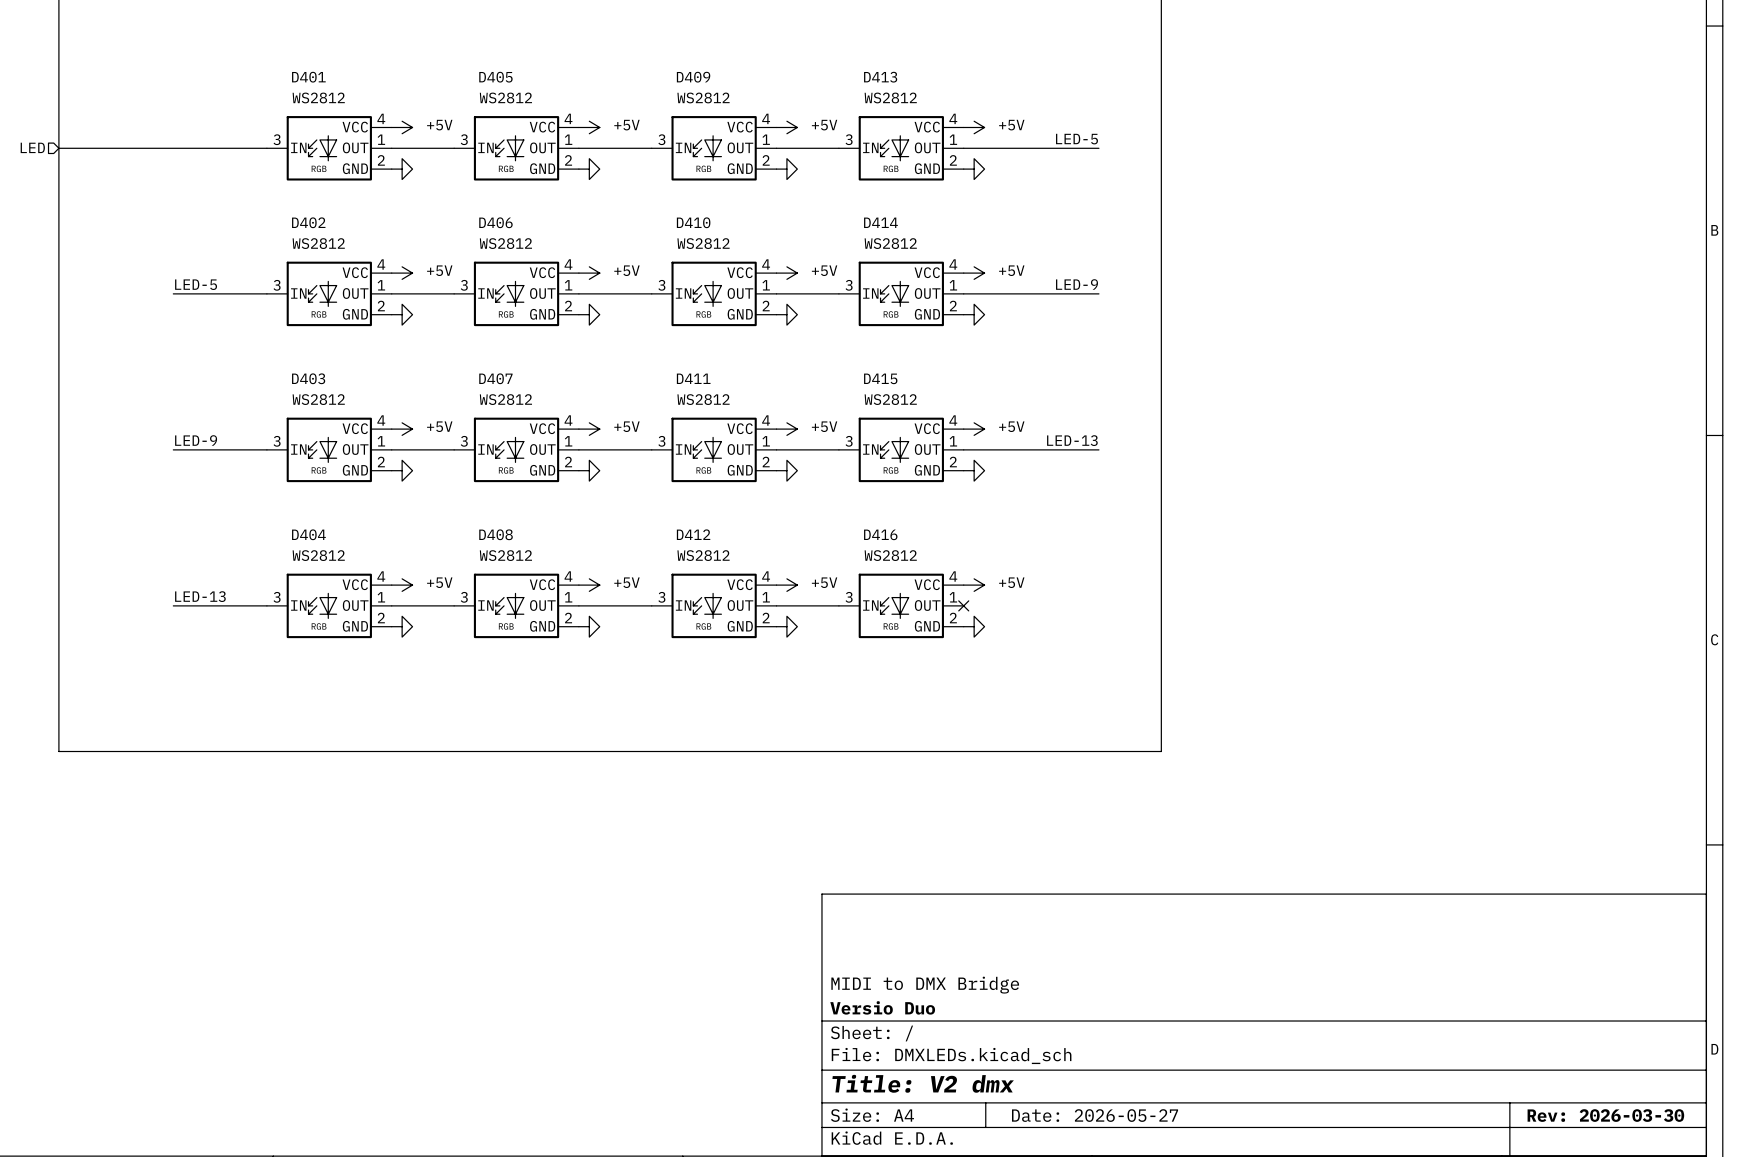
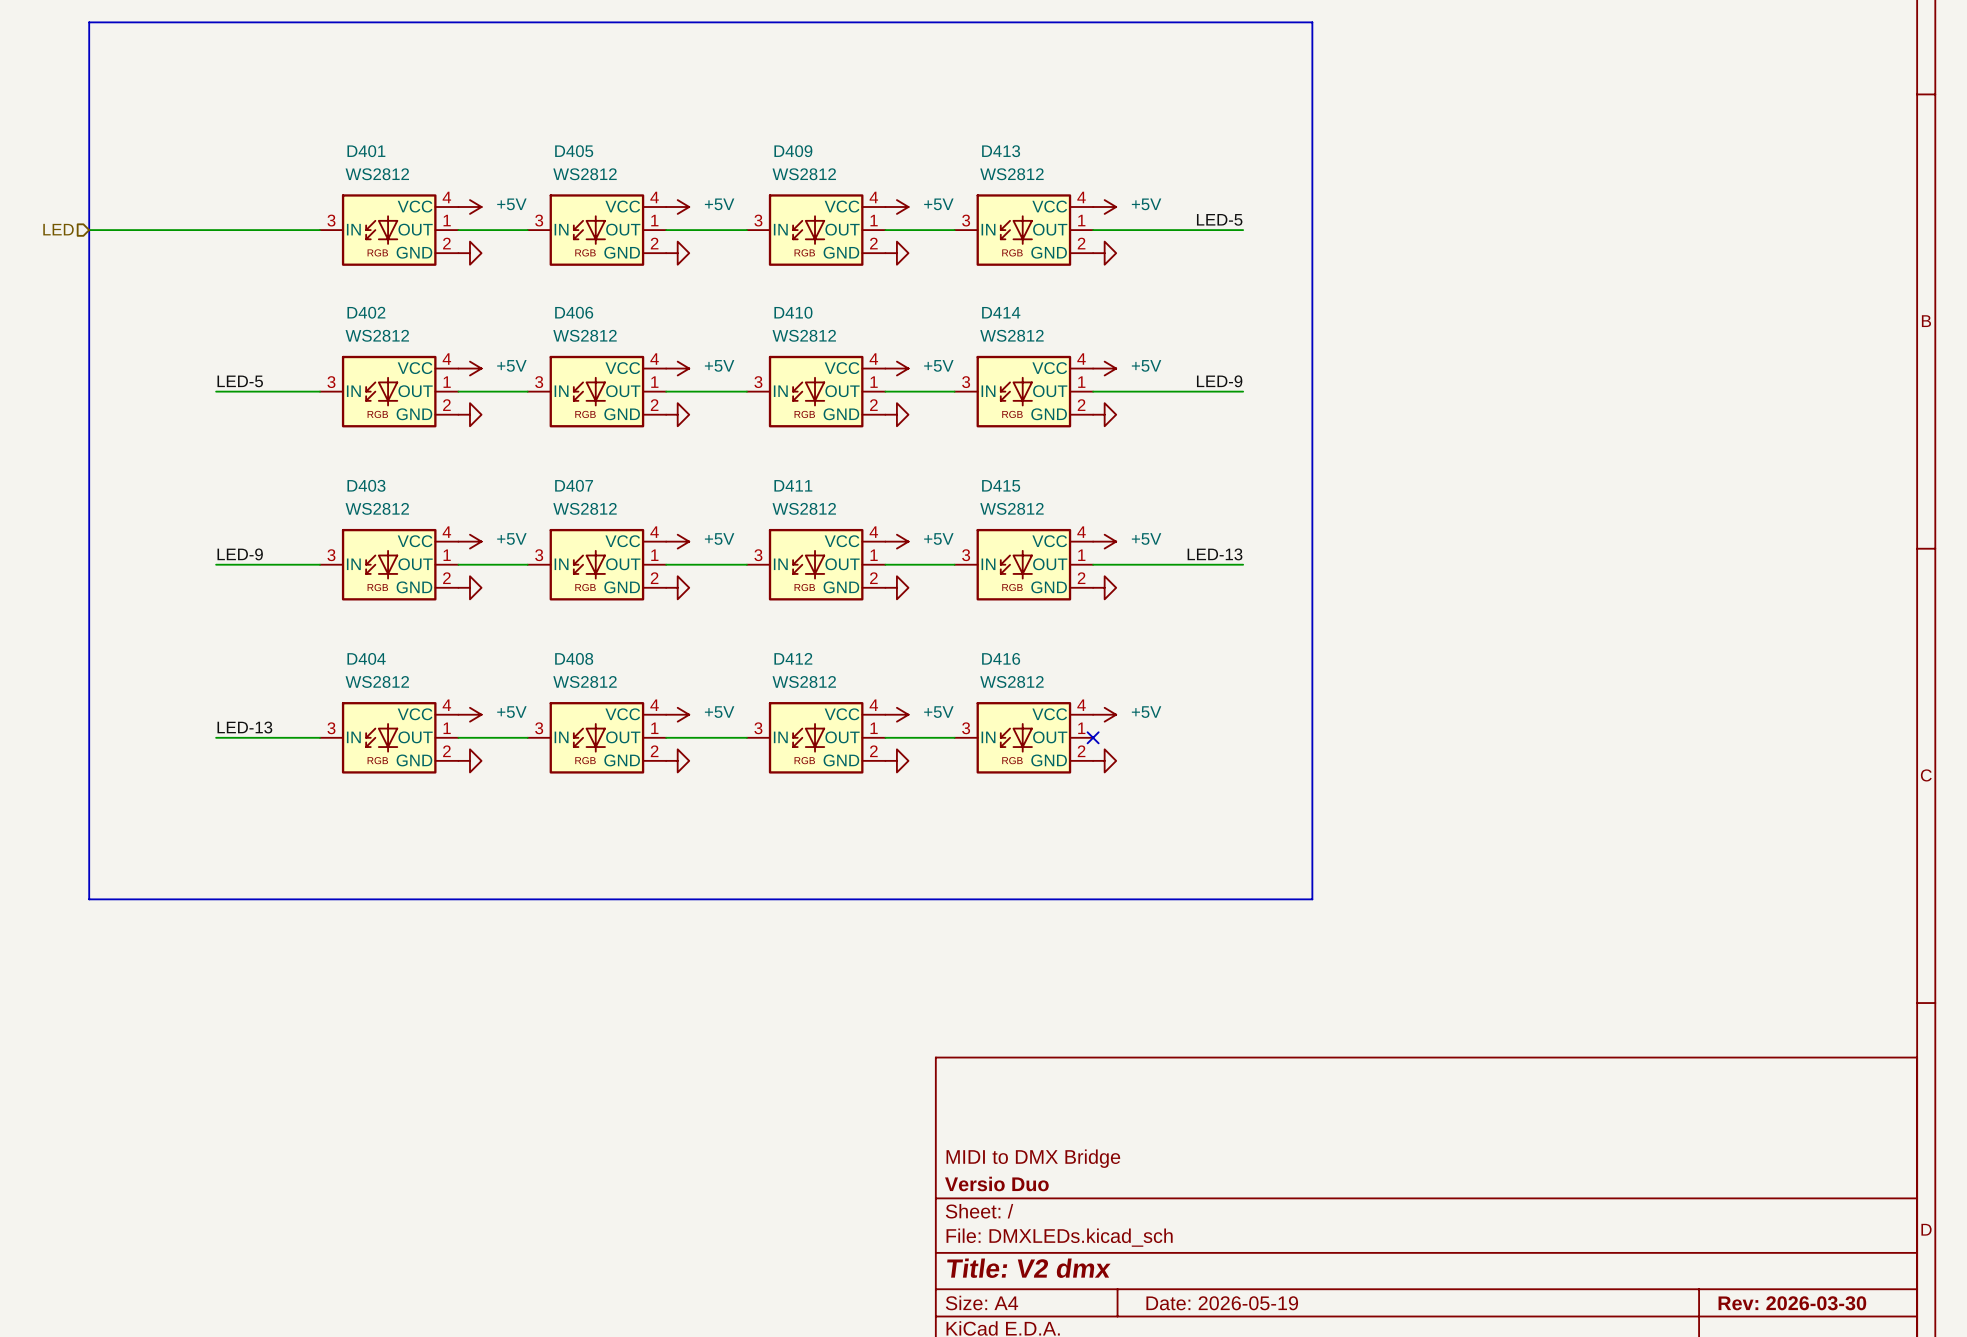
title block: Date: 2026-05-27 (1095, 1115) -> Date: 2026-05-19 (1222, 1303)

